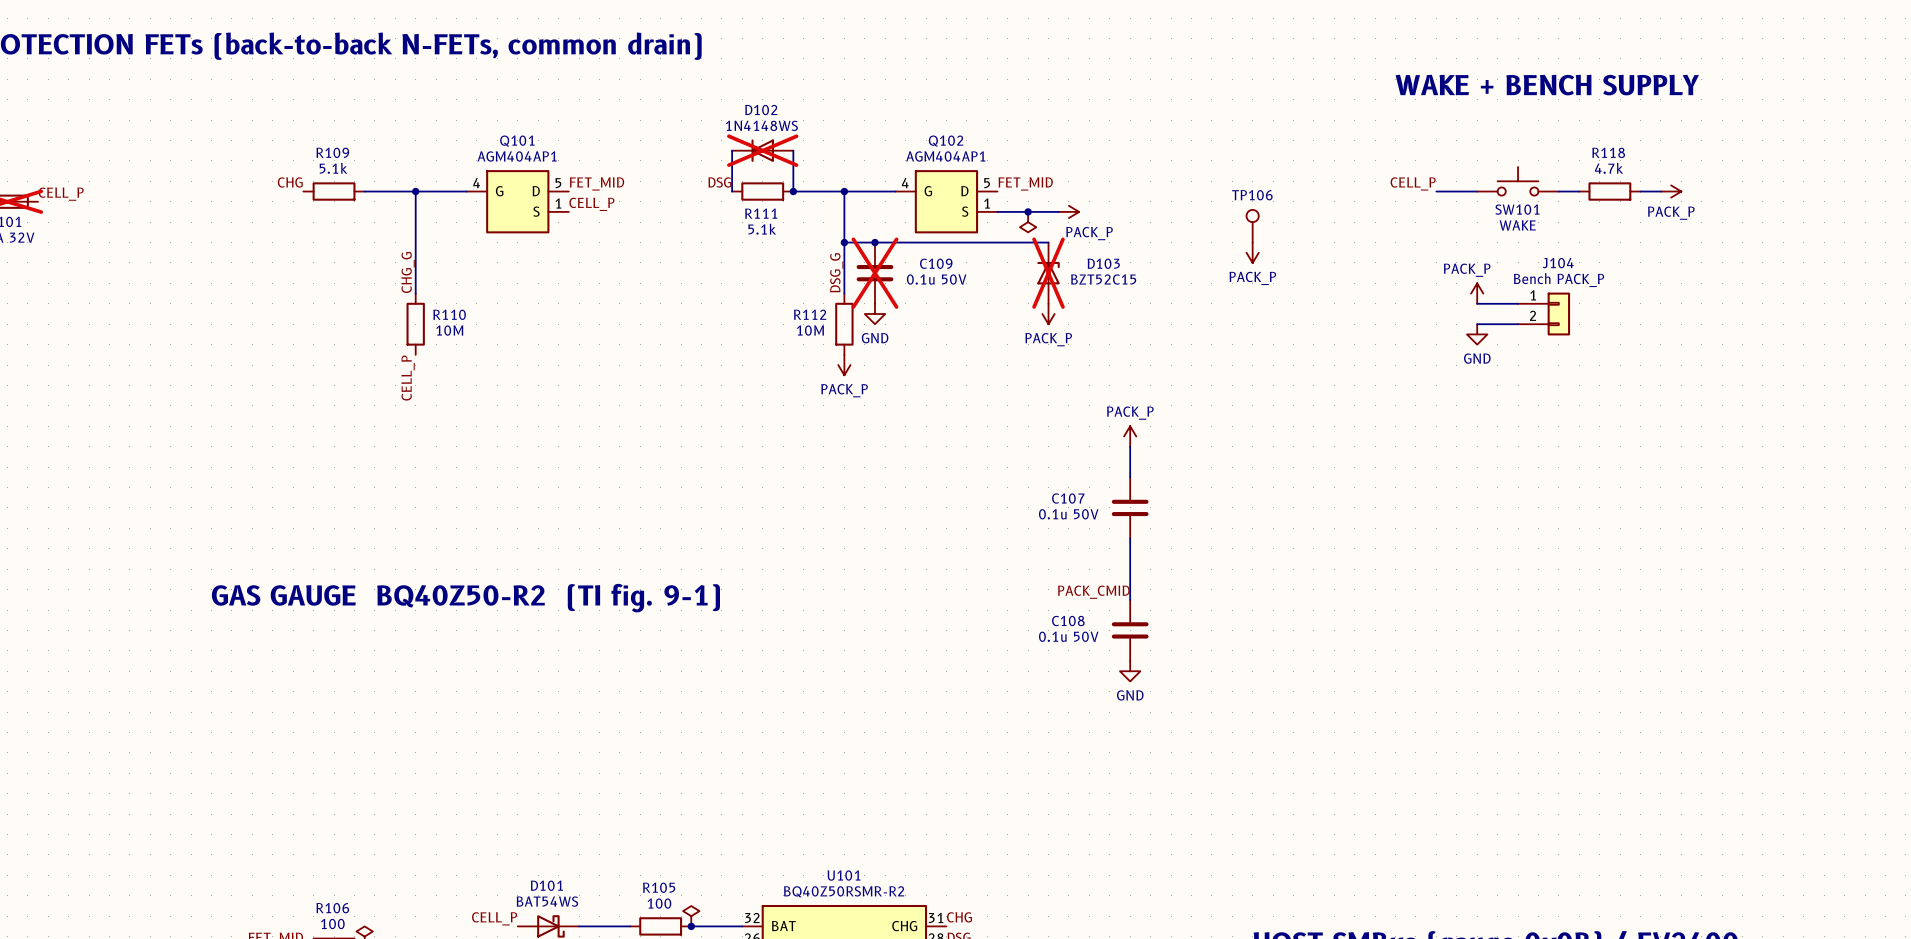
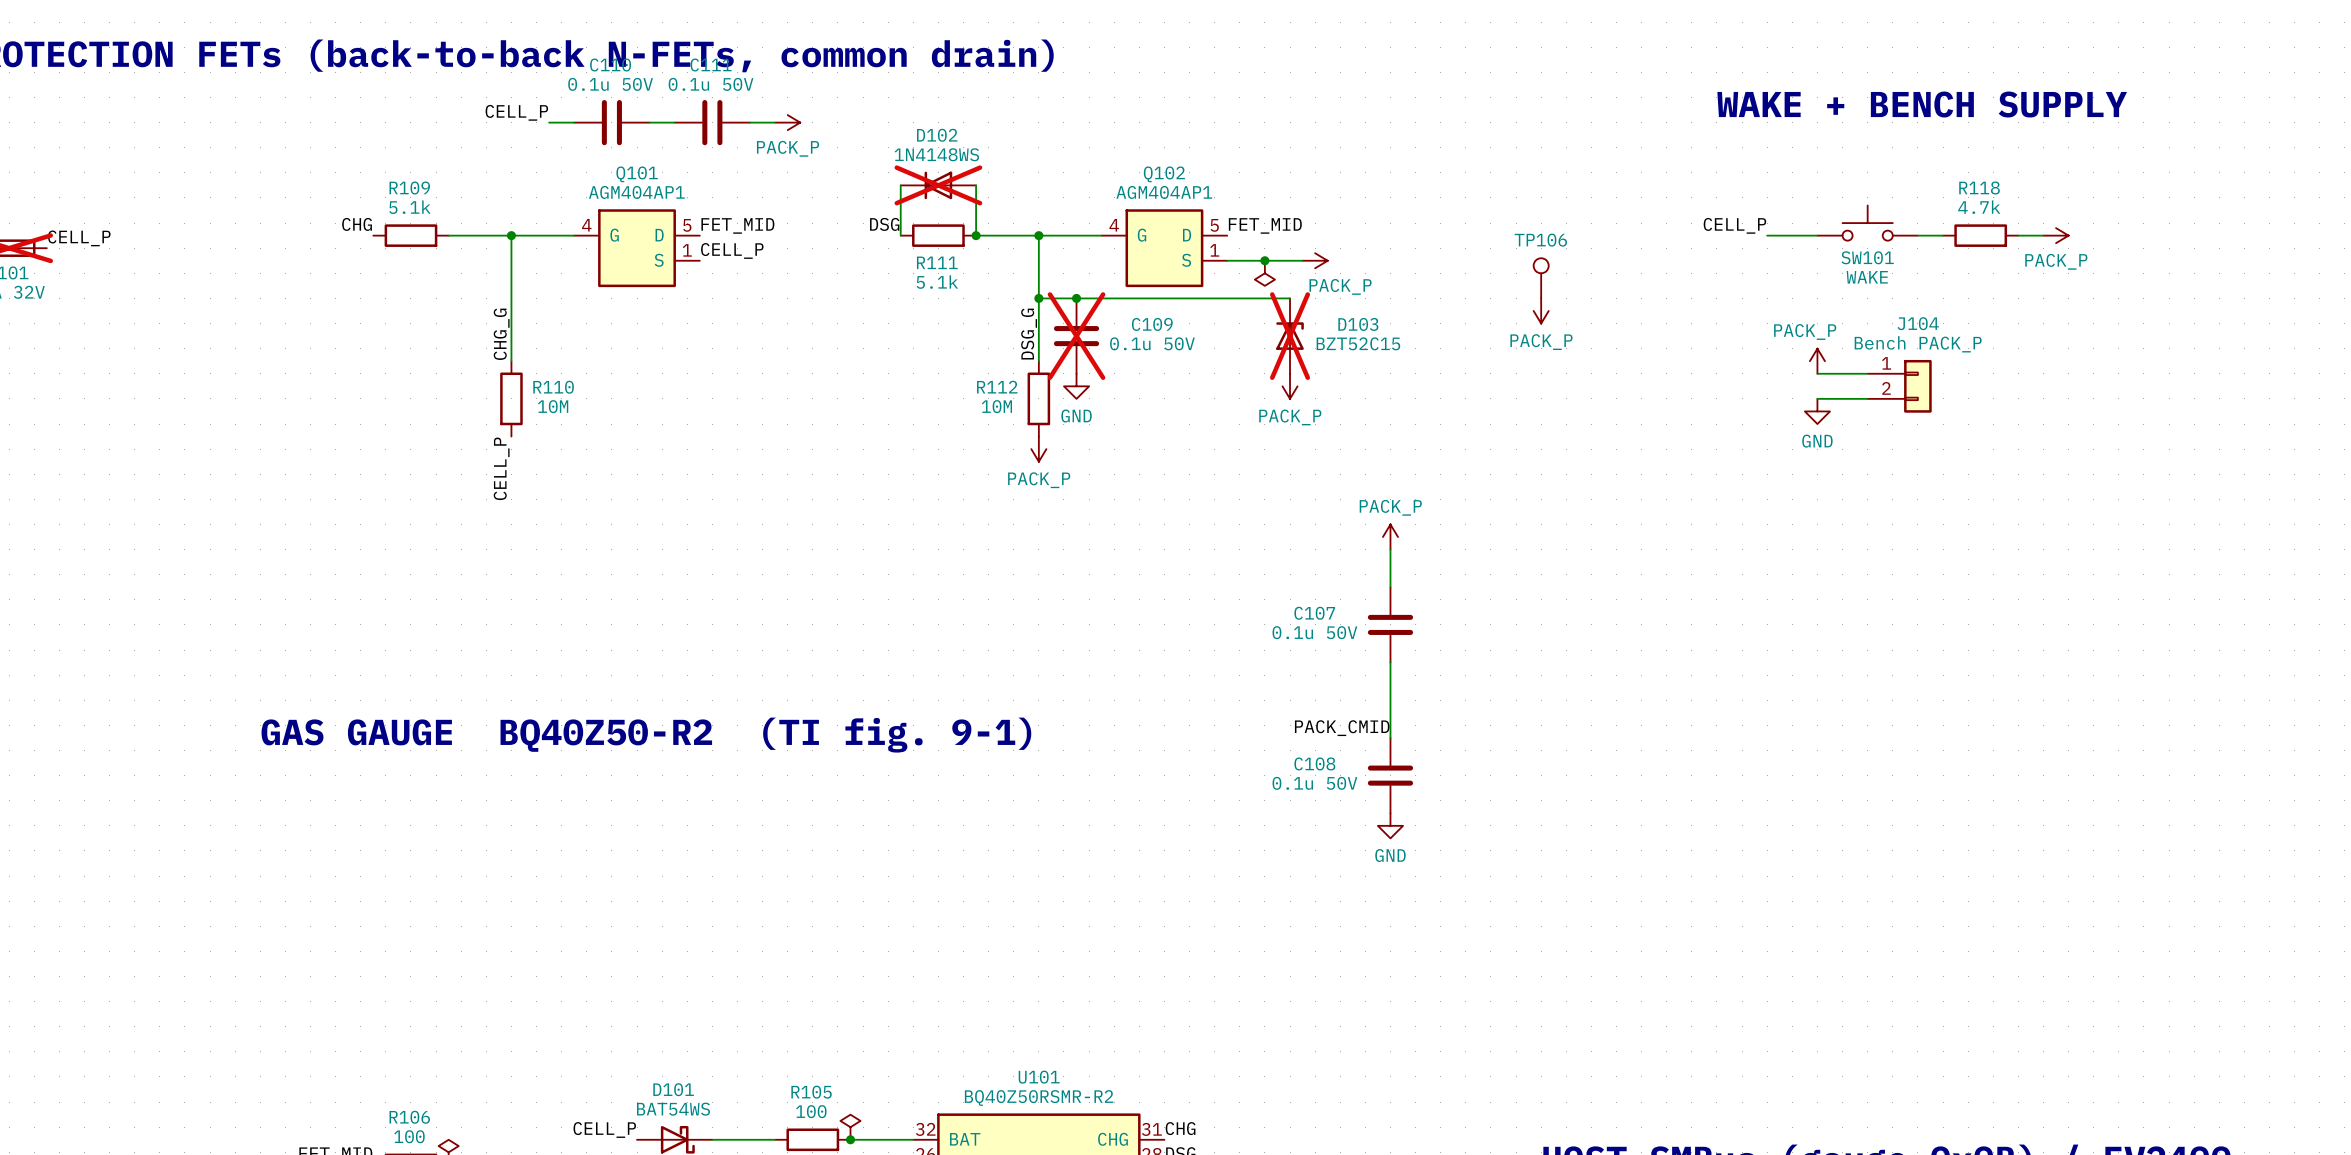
label: none -> CELL_P (516, 112)
wire: none -> (549, 122) (574, 122)
C110: none -> 0.1u 50V (611, 122)
wire: none -> (649, 122) (674, 122)
C111: none -> 0.1u 50V (712, 122)
wire: none -> (750, 122) (775, 122)
power symbol: none -> PACK_P (787, 122)

